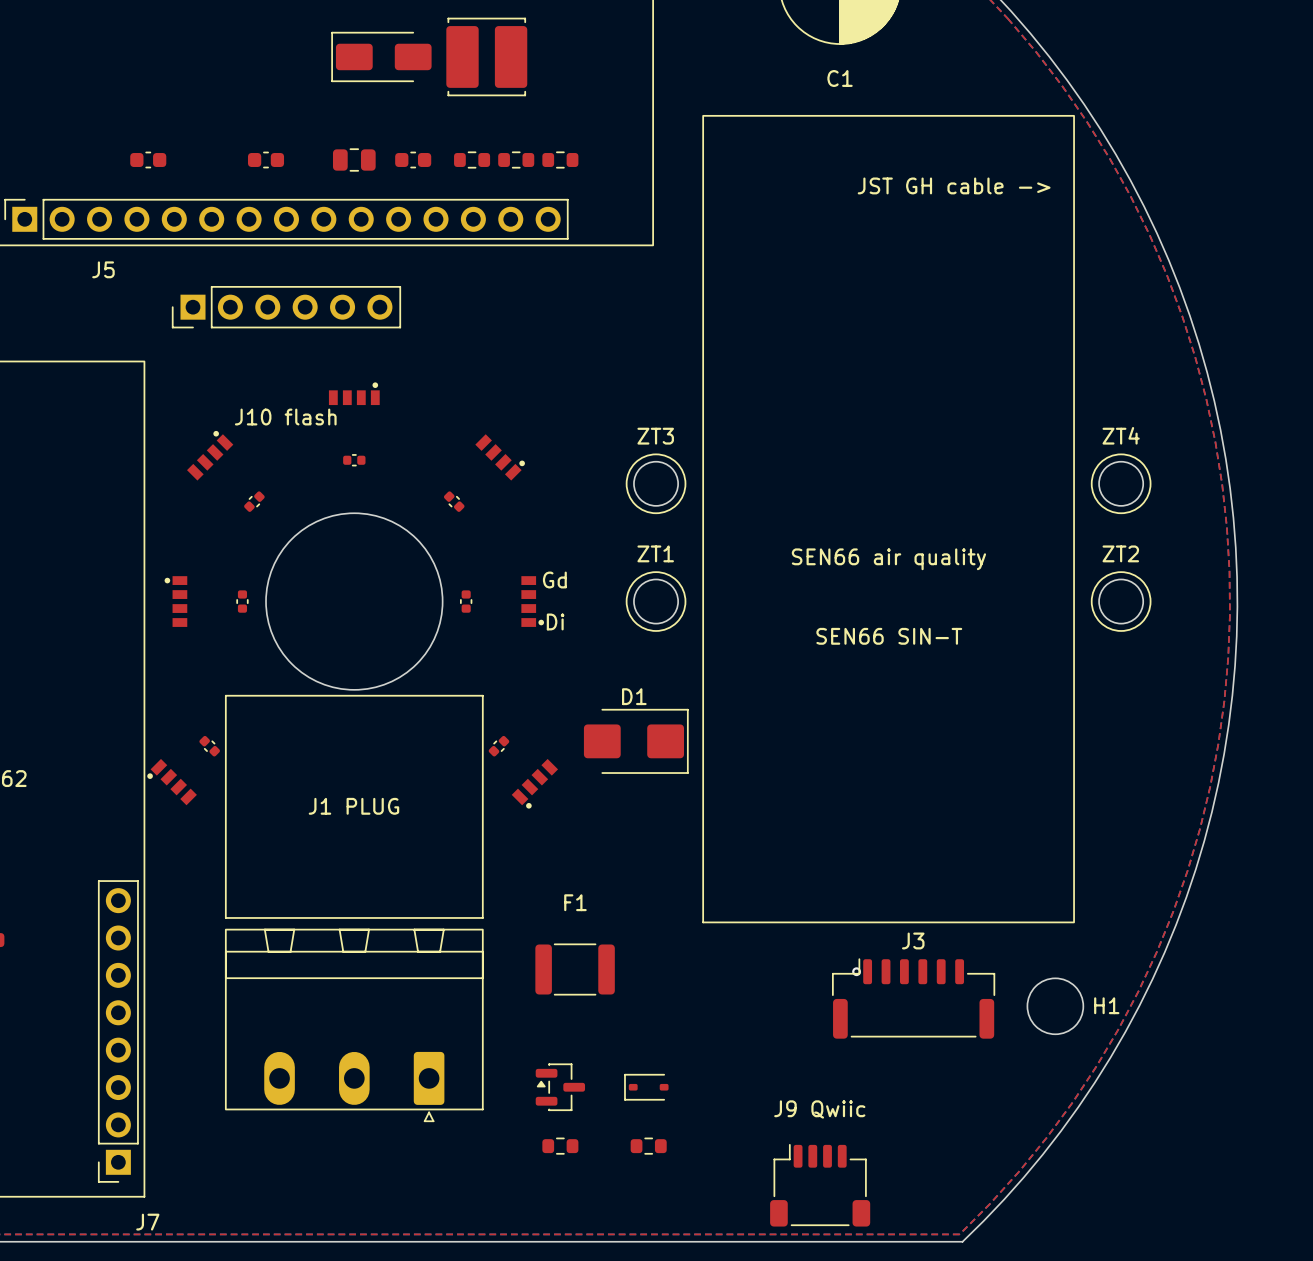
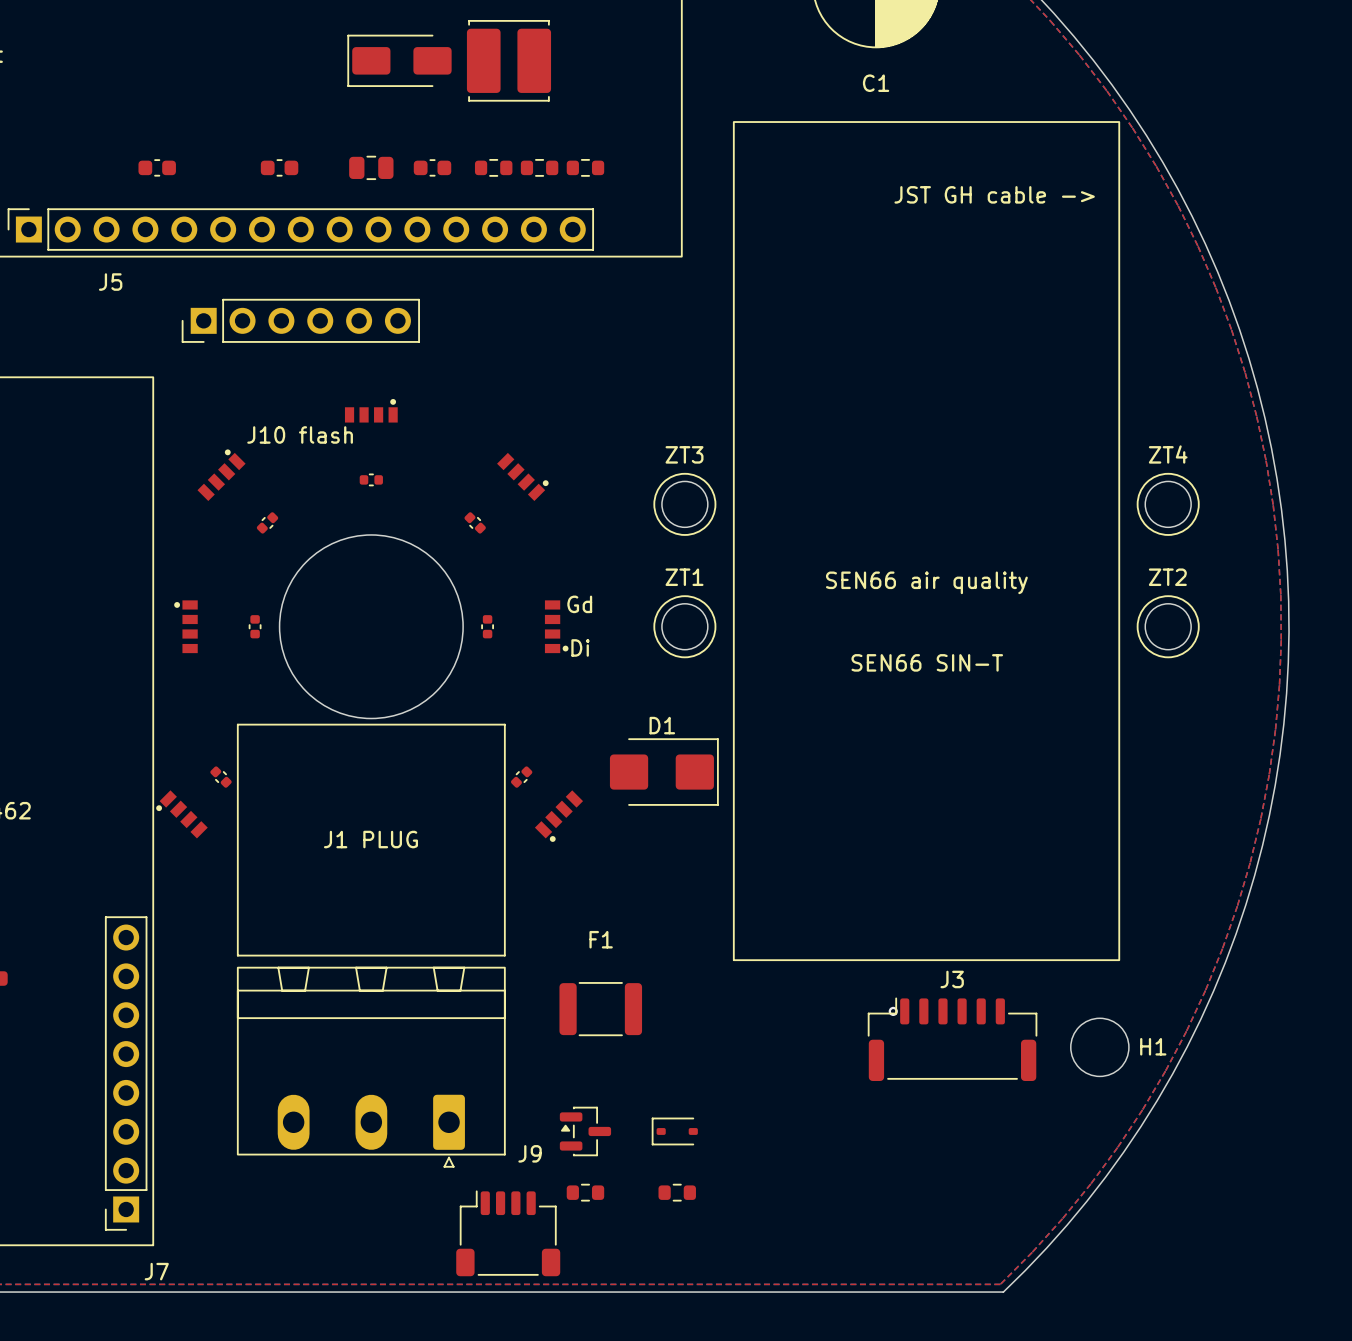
text: none -> J9 (530, 1153)
text: J9 Qwiic (819, 1109) -> none
part position: (820, 1185) -> (508, 1233)

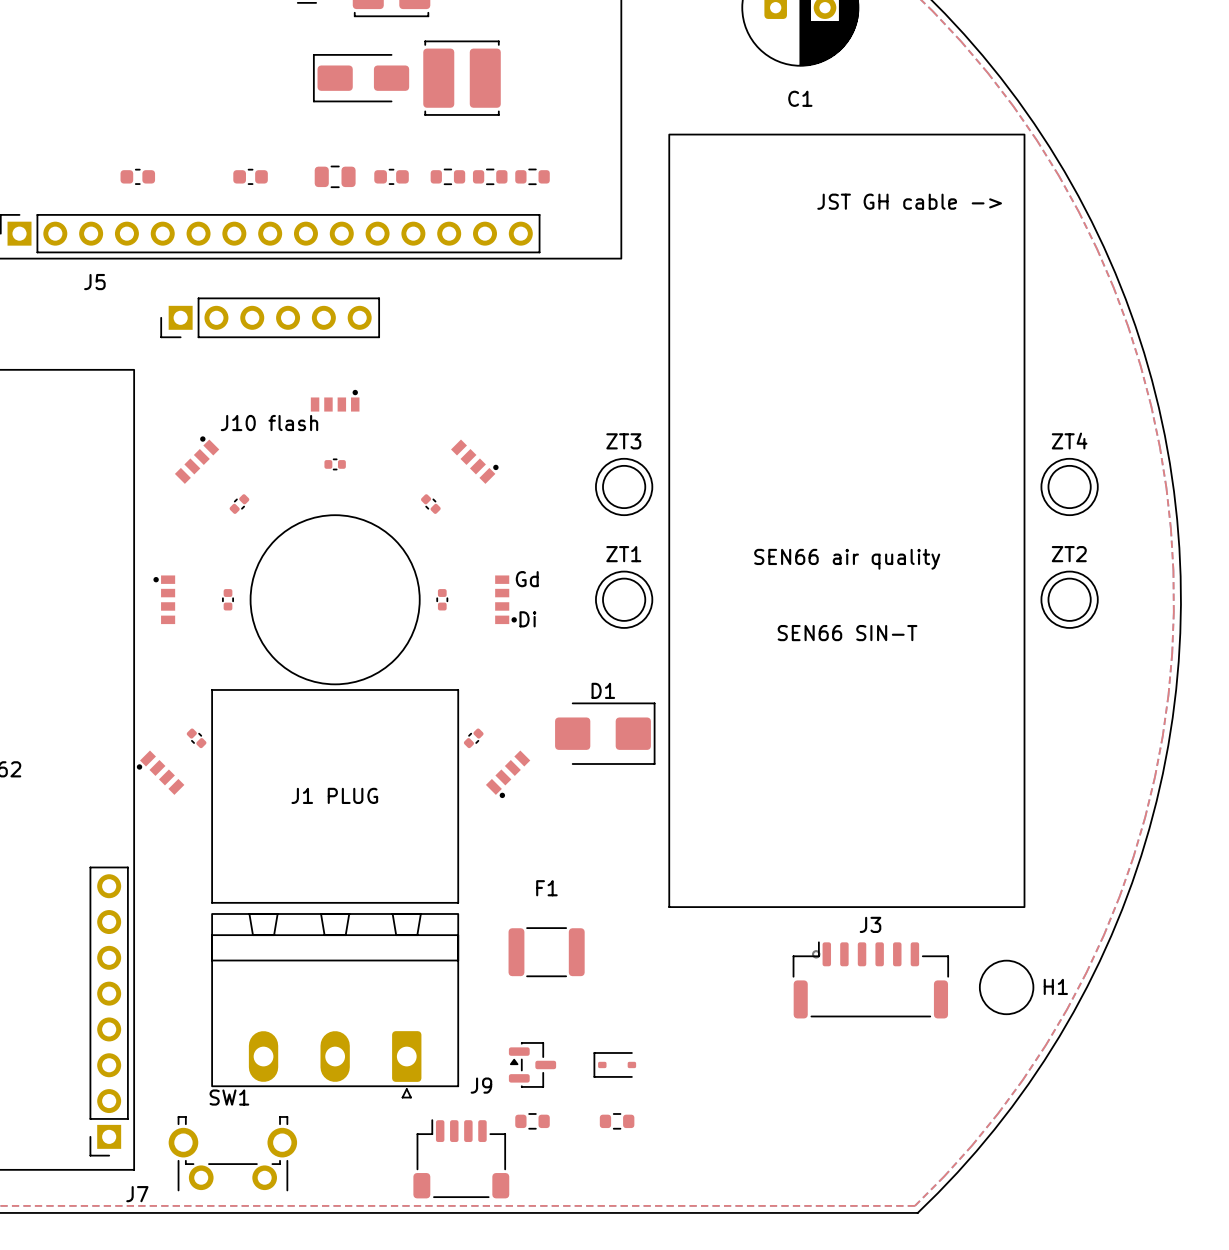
text: none -> SW1 (229, 1097)
part: none -> (232, 1153)

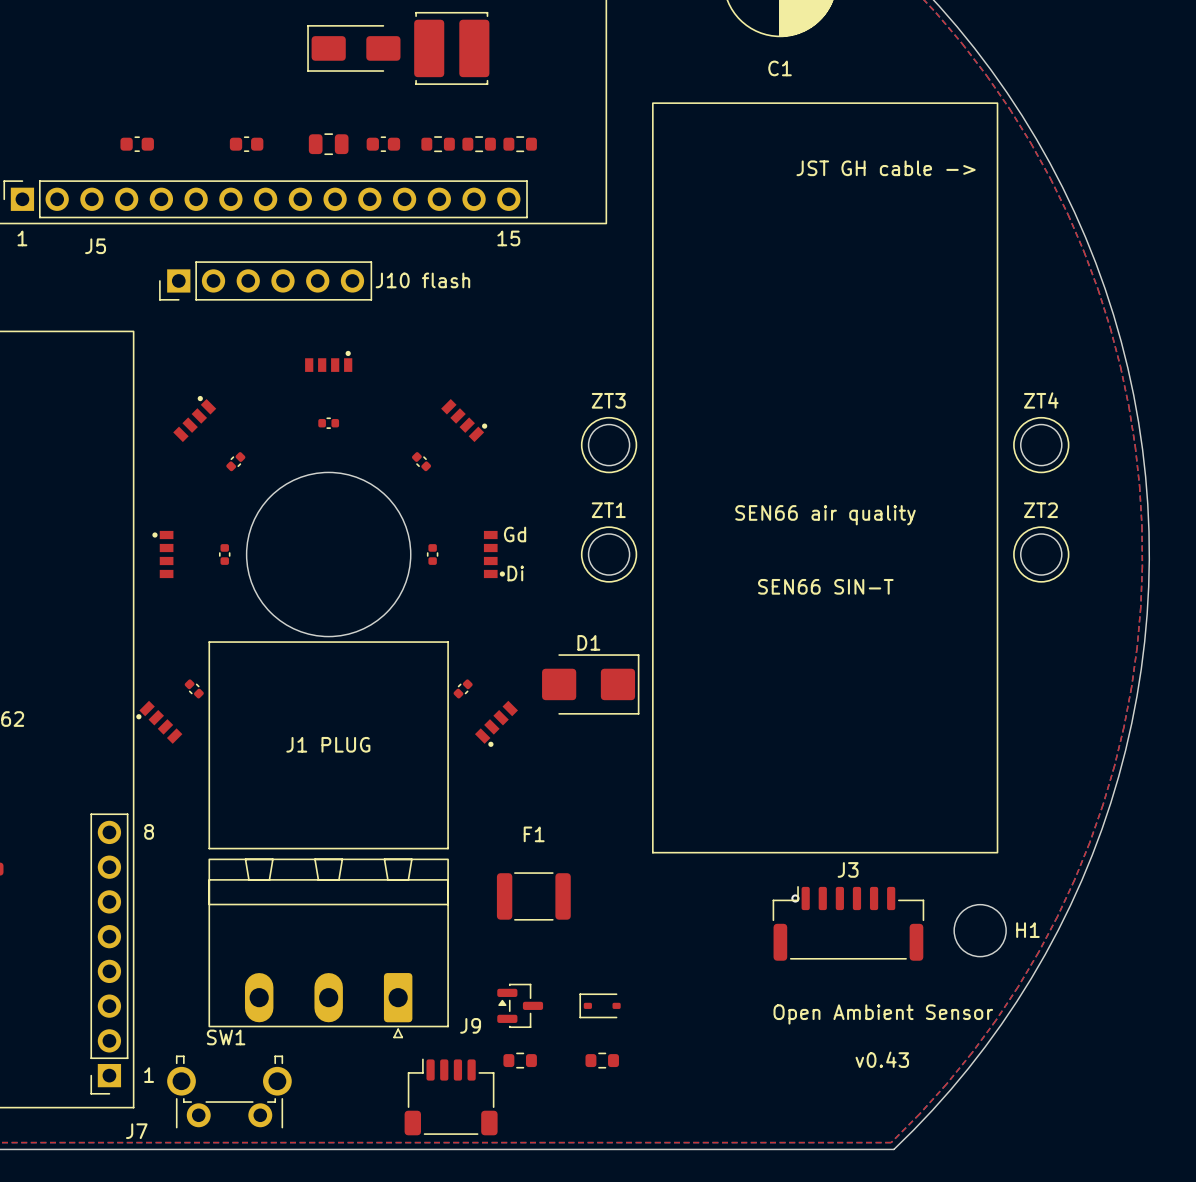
text: none -> 1 (22, 238)
text: none -> 15 (508, 238)
text position: J10 flash (269, 423) -> J10 flash (422, 280)
text: none -> 8 (149, 831)
text: none -> Open Ambient Sensor (883, 1014)
text: none -> v0.43 (882, 1059)
text: none -> 1 (149, 1075)

